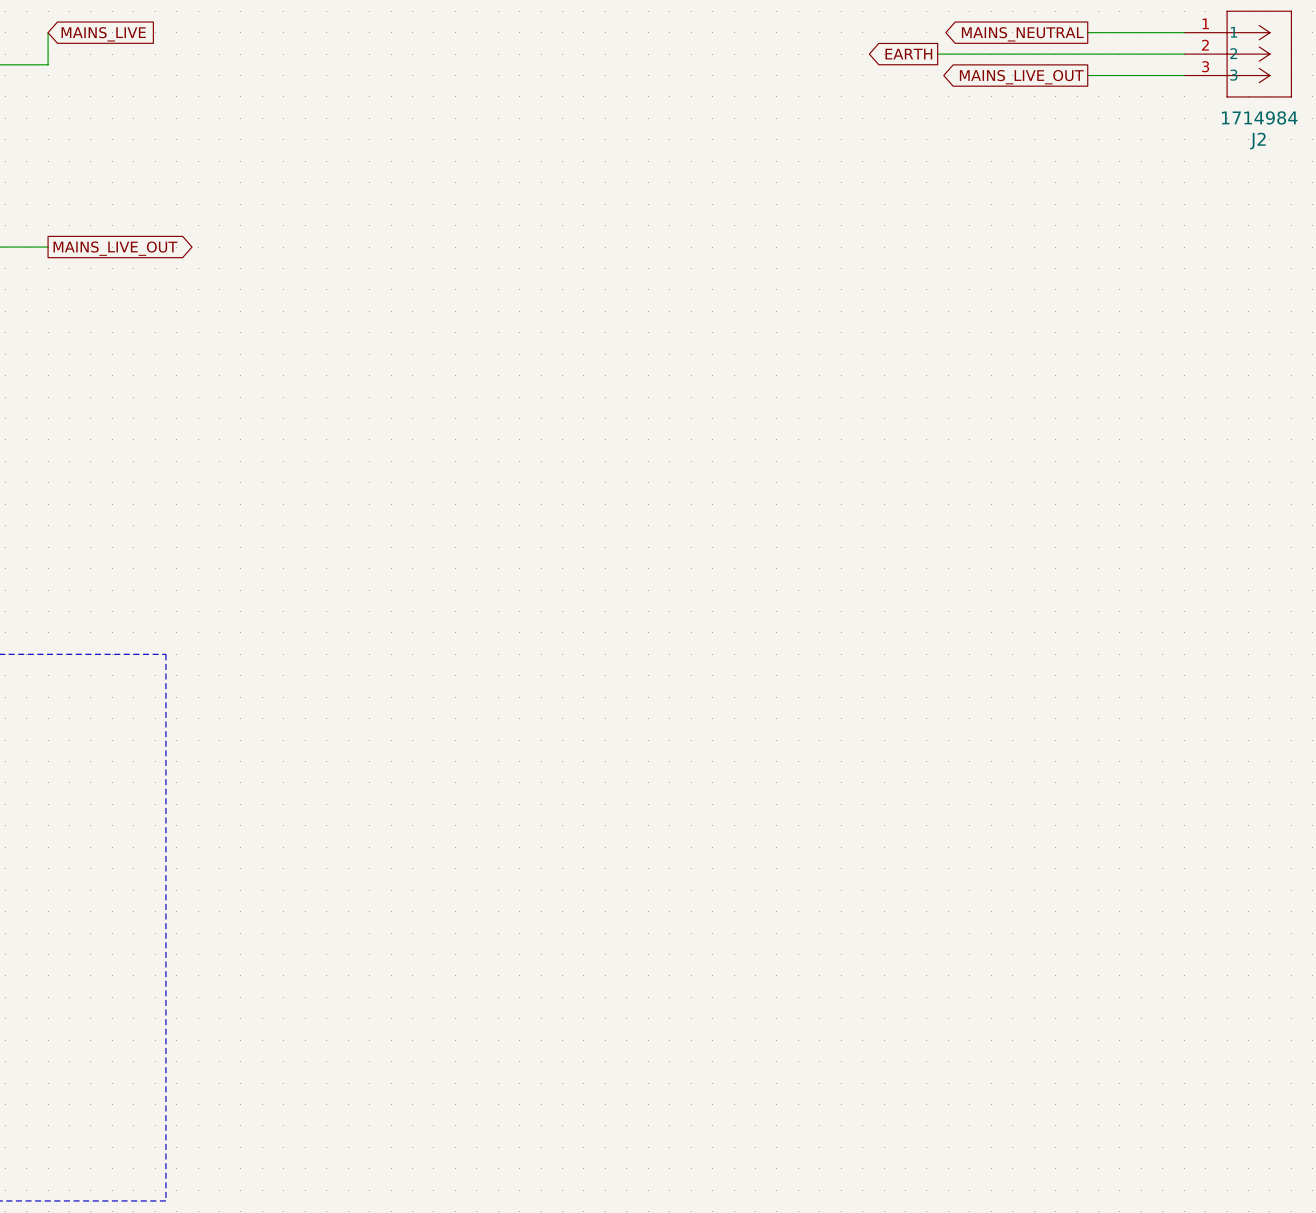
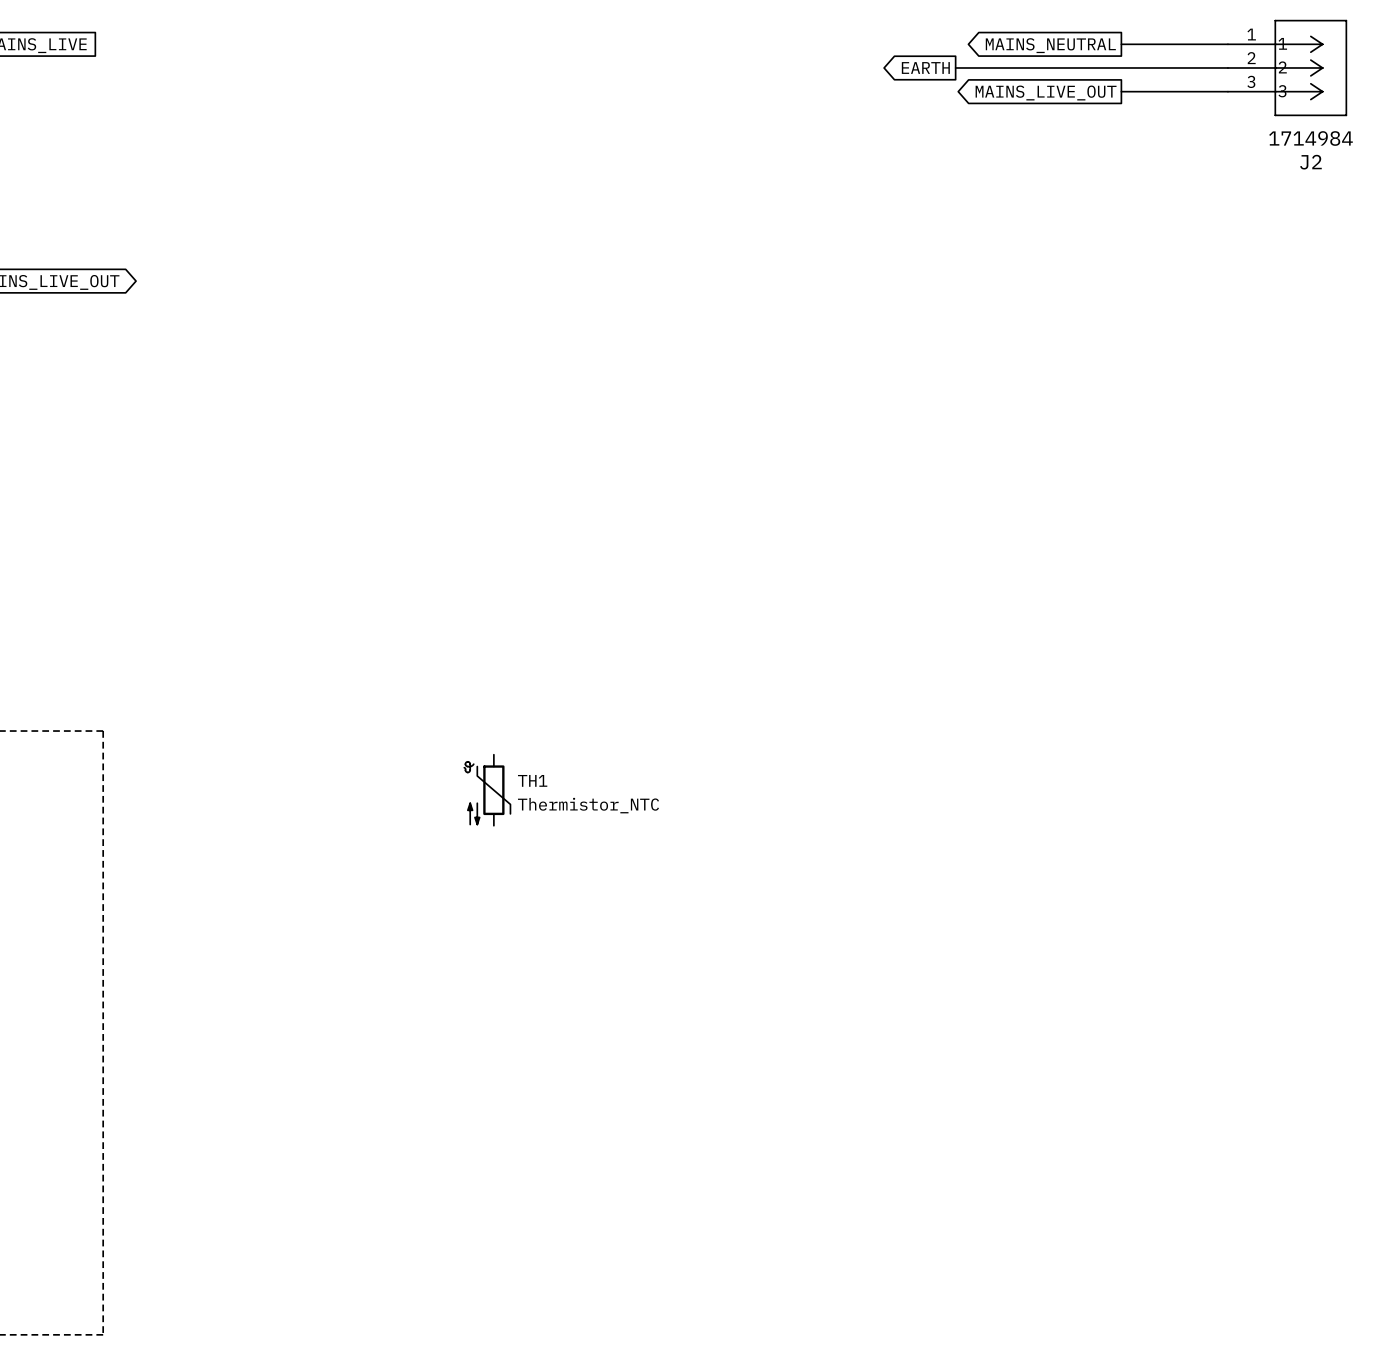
TH1: none -> Thermistor_NTC (487, 790)

